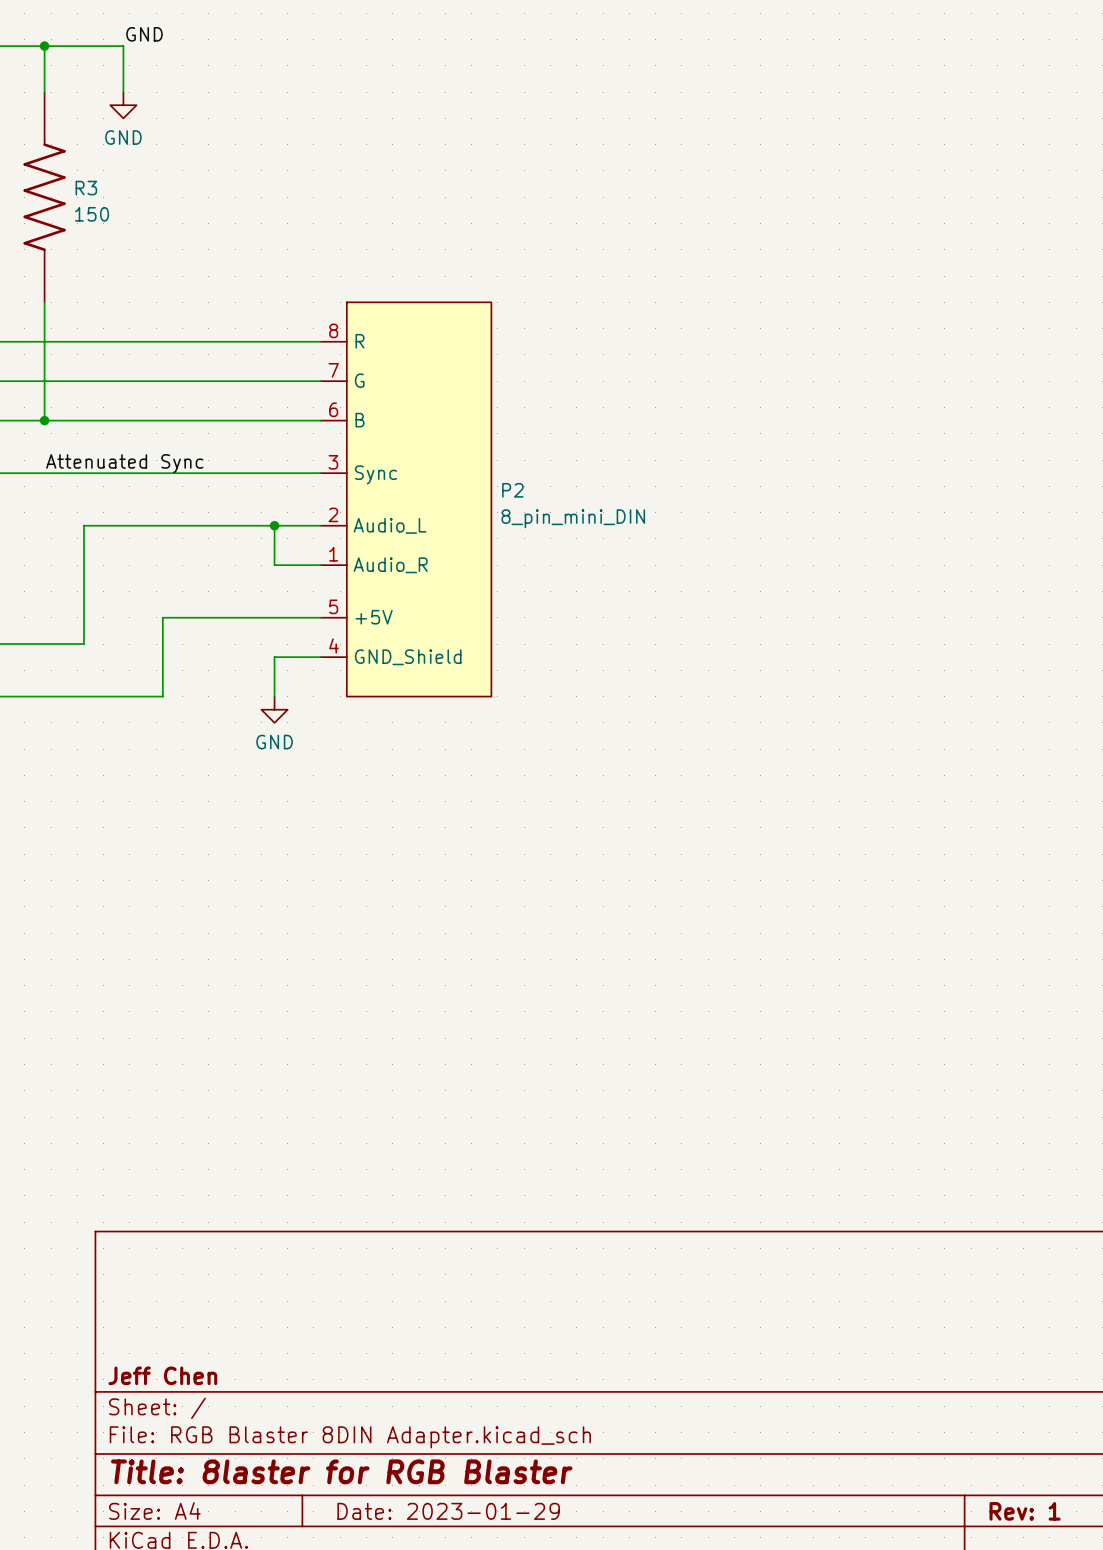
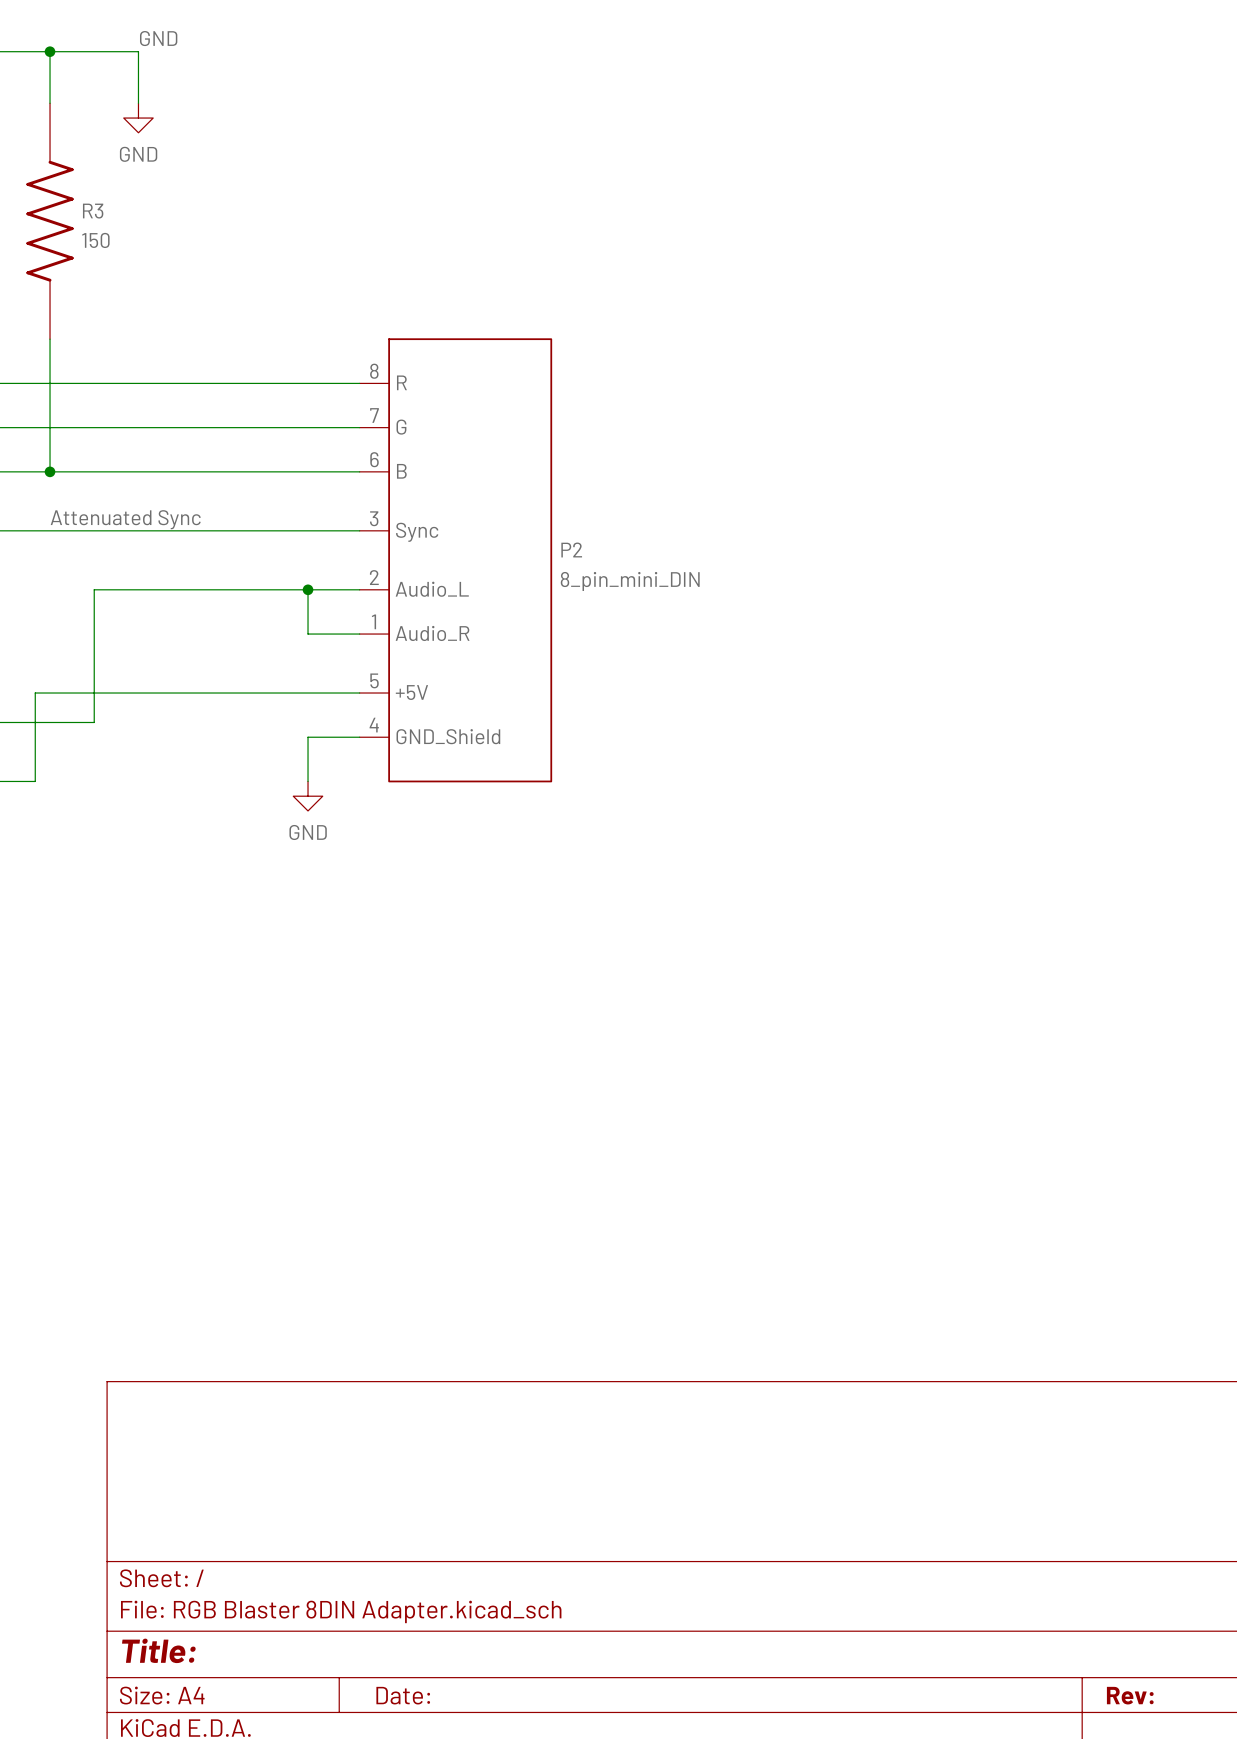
wire: (162, 617) (162, 696) (31, 696) -> (182, 693) (35, 693) (35, 781)
title block: Jeff Chen (162, 1375) -> none
title block: Title: 8laster for RGB Blaster (341, 1471) -> Title: (158, 1650)
title block: Date: 2023-01-29 (448, 1511) -> Date: (403, 1695)
title block: Rev: 1 (1025, 1511) -> Rev: (1130, 1695)

